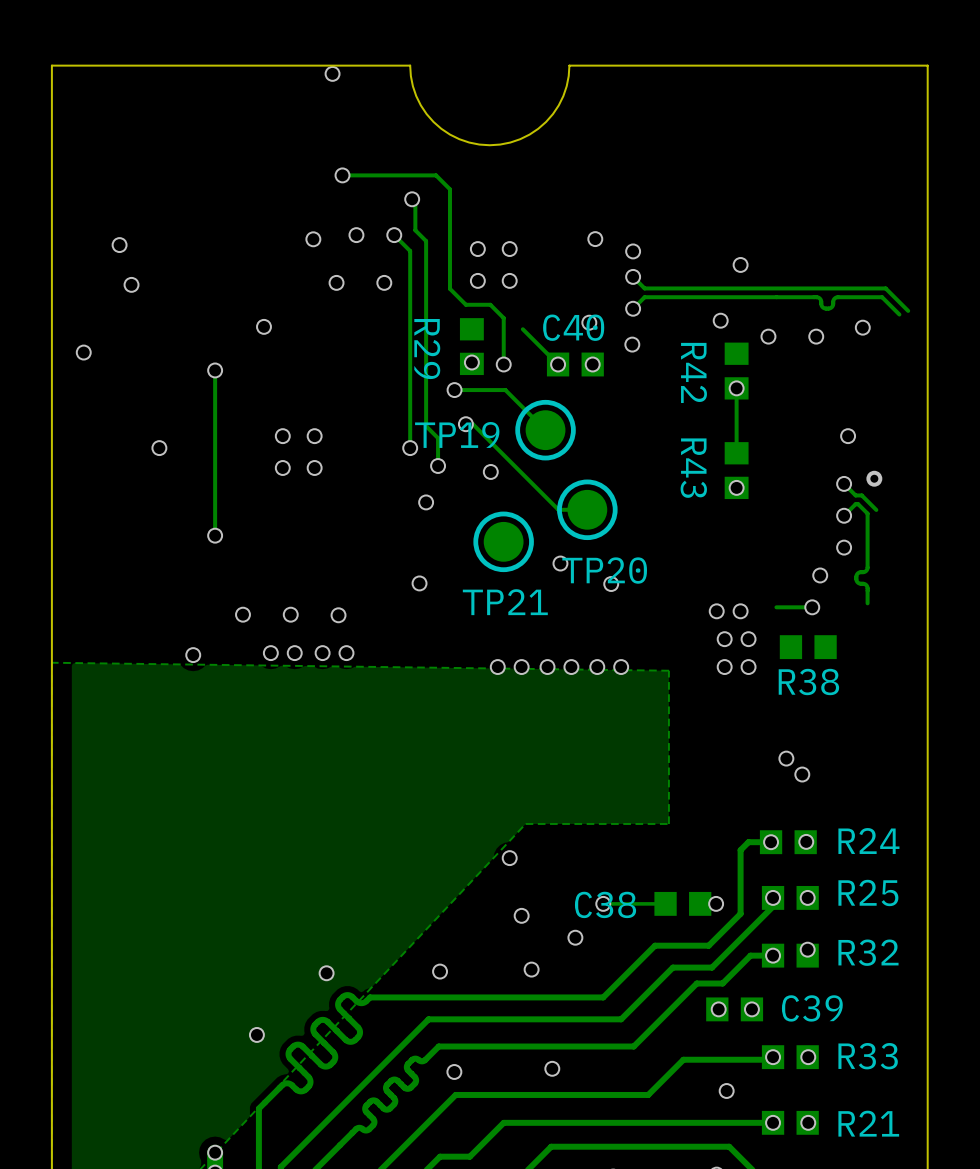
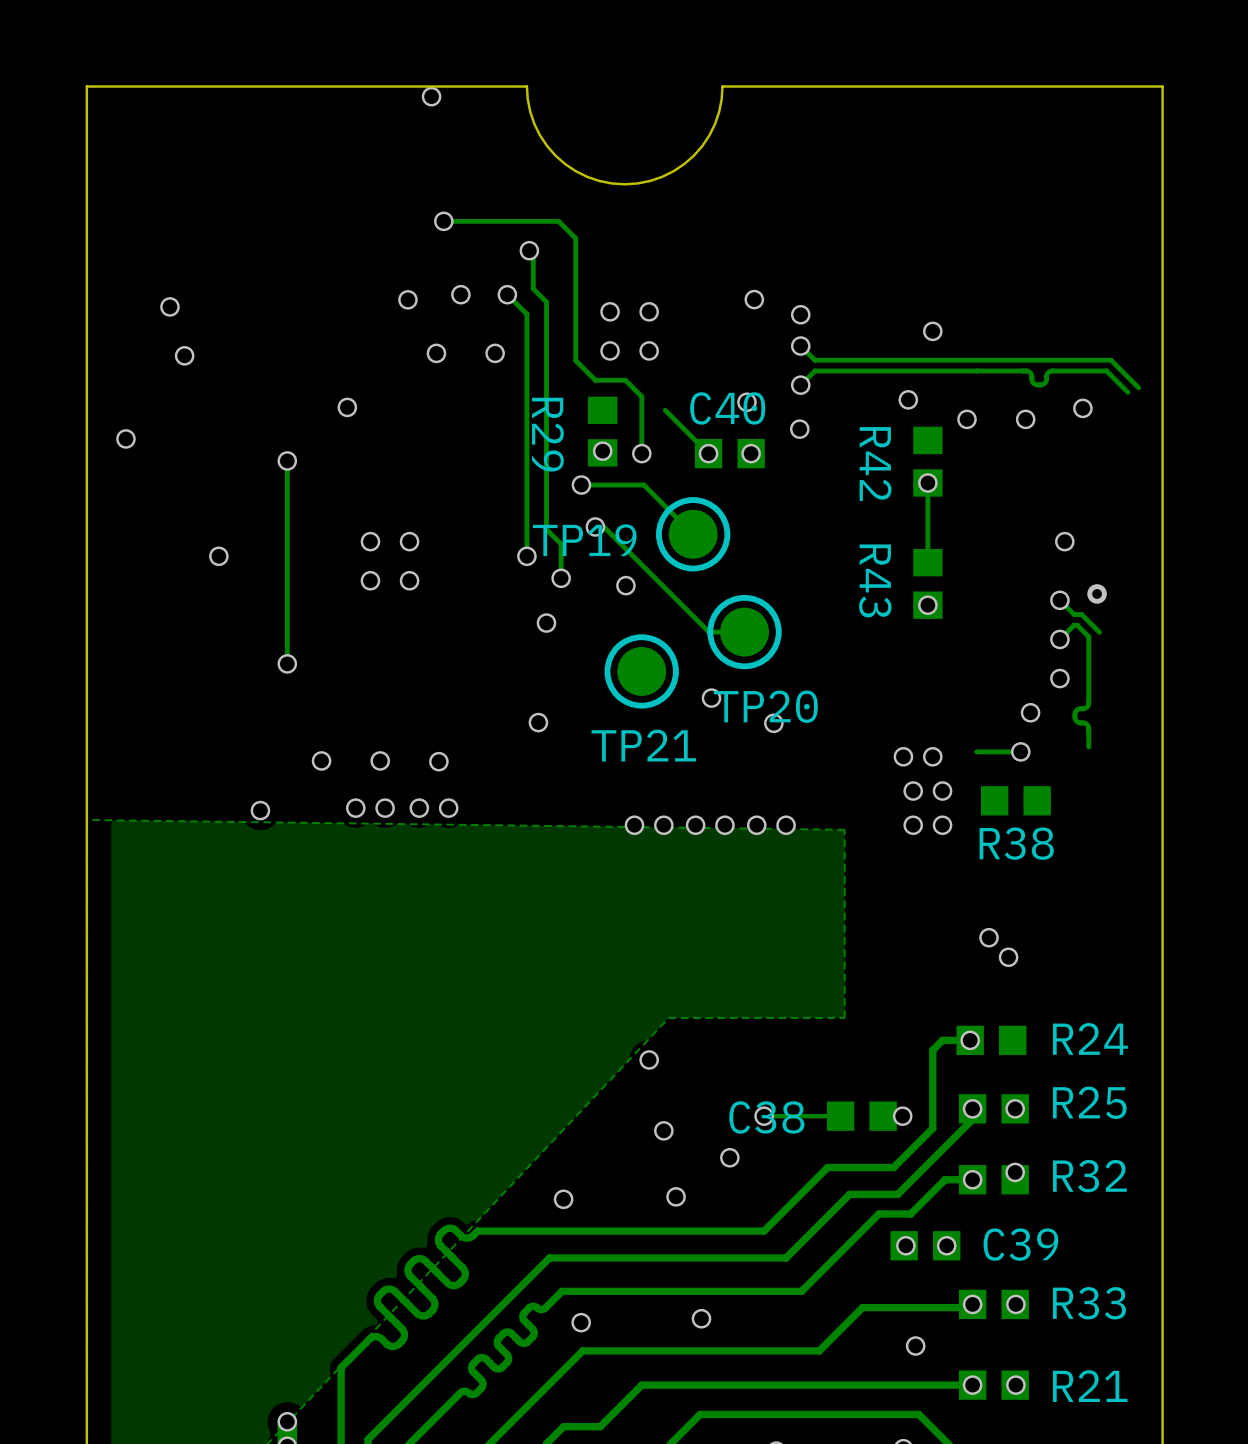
via: (806, 841) -> none
via: (326, 973) -> none
via: (256, 1034) -> none

